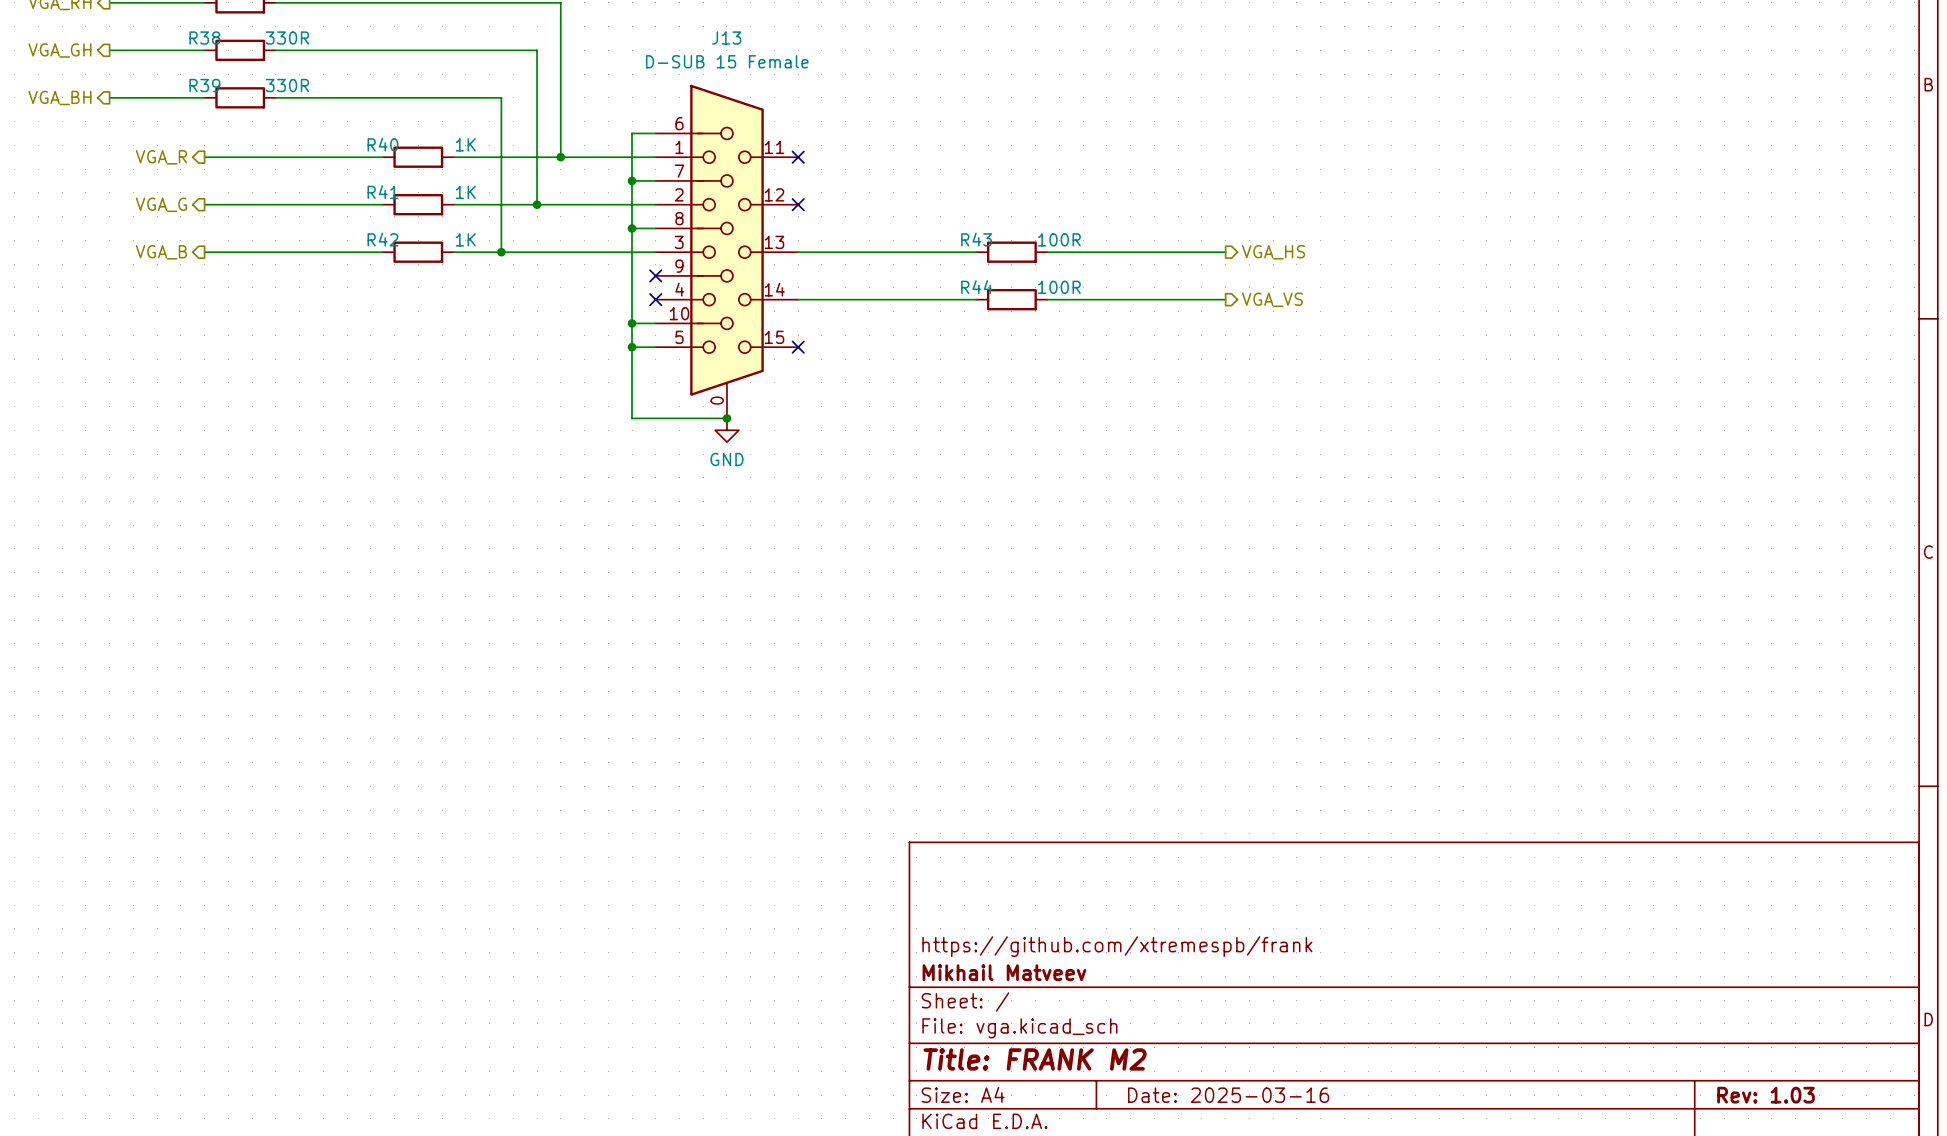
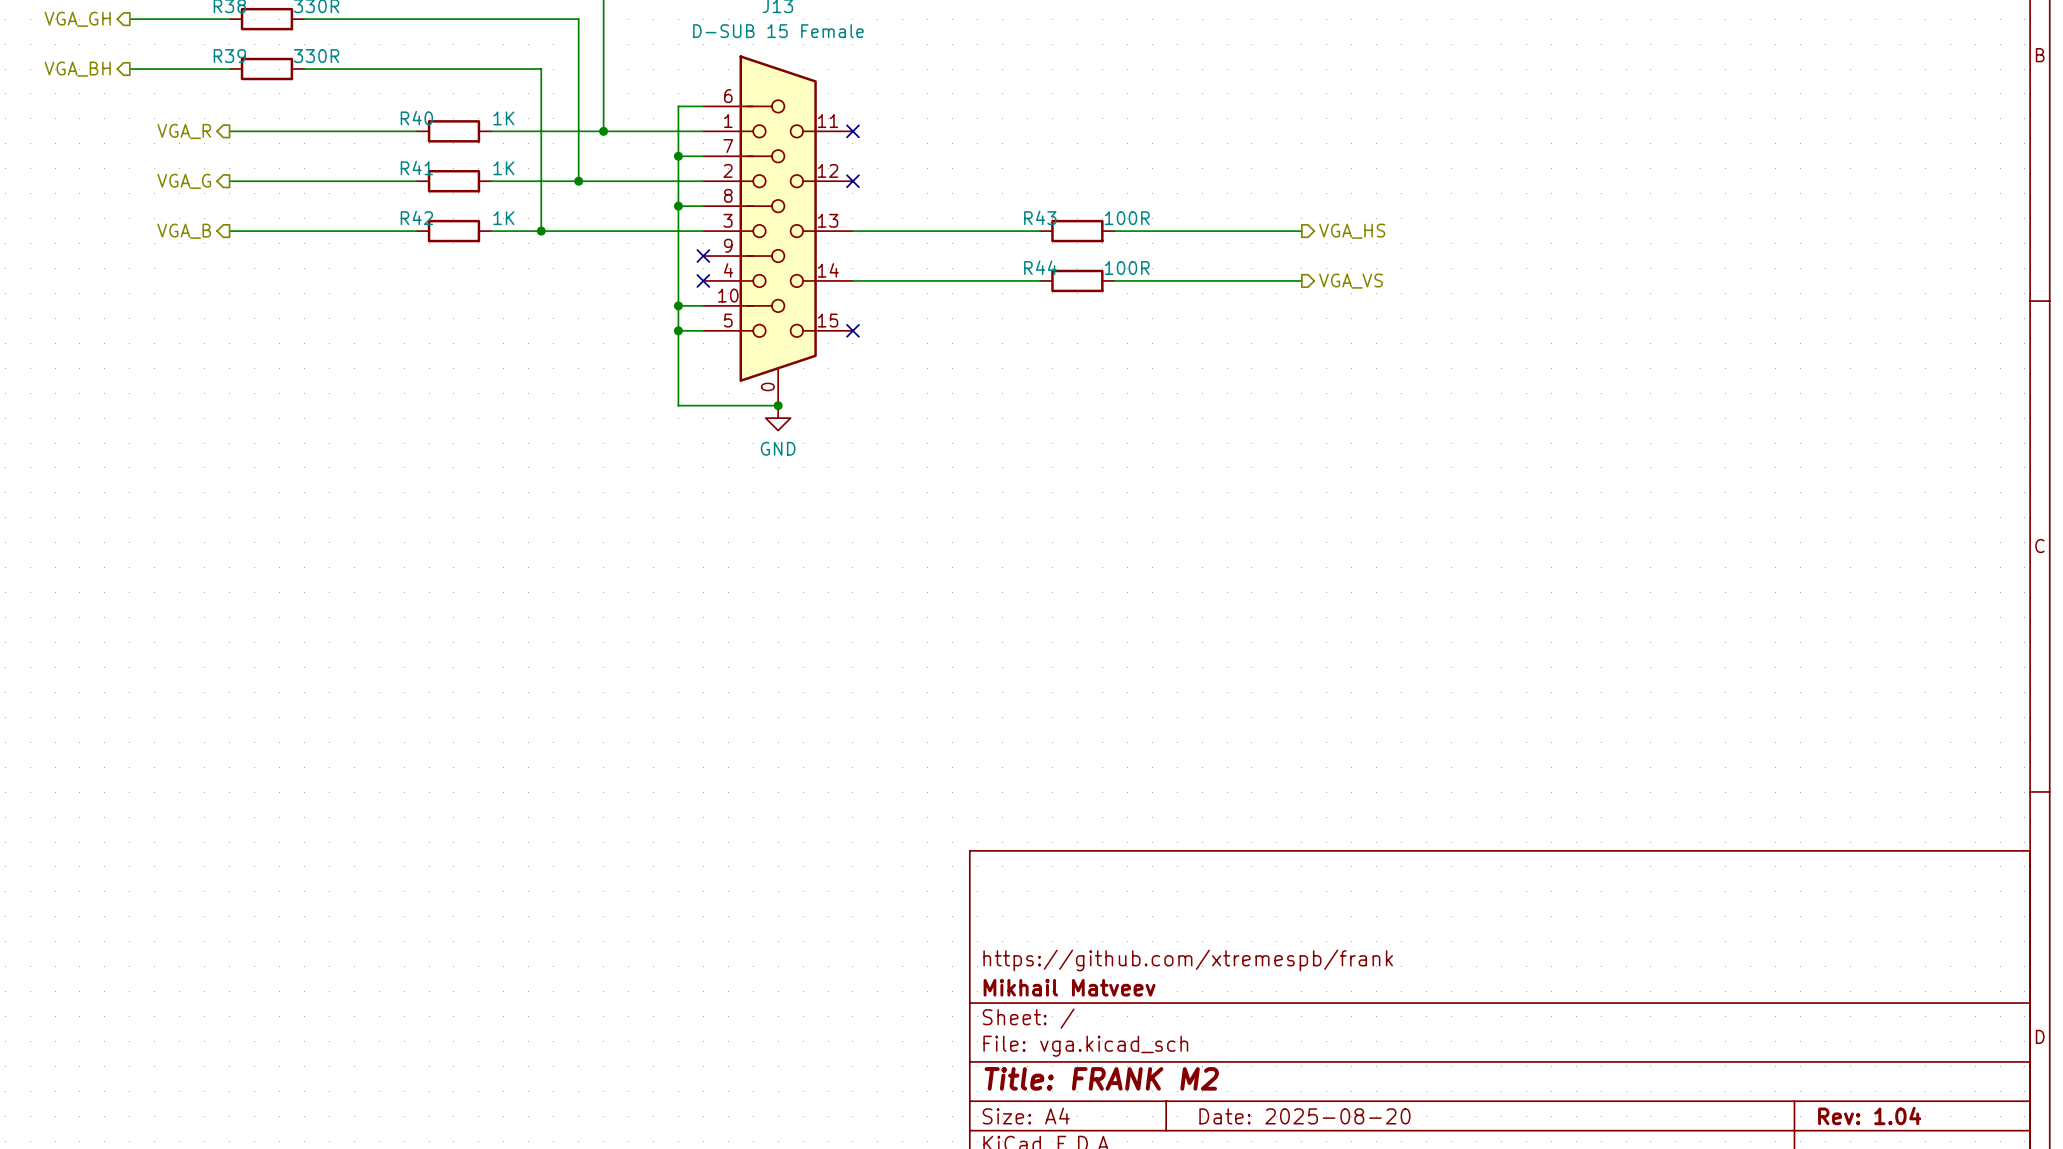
title block: Date: 2025-03-16 (1228, 1095) -> Date: 2025-08-20 (1304, 1116)
title block: Rev: 1.03 (1766, 1095) -> Rev: 1.04 (1869, 1116)

